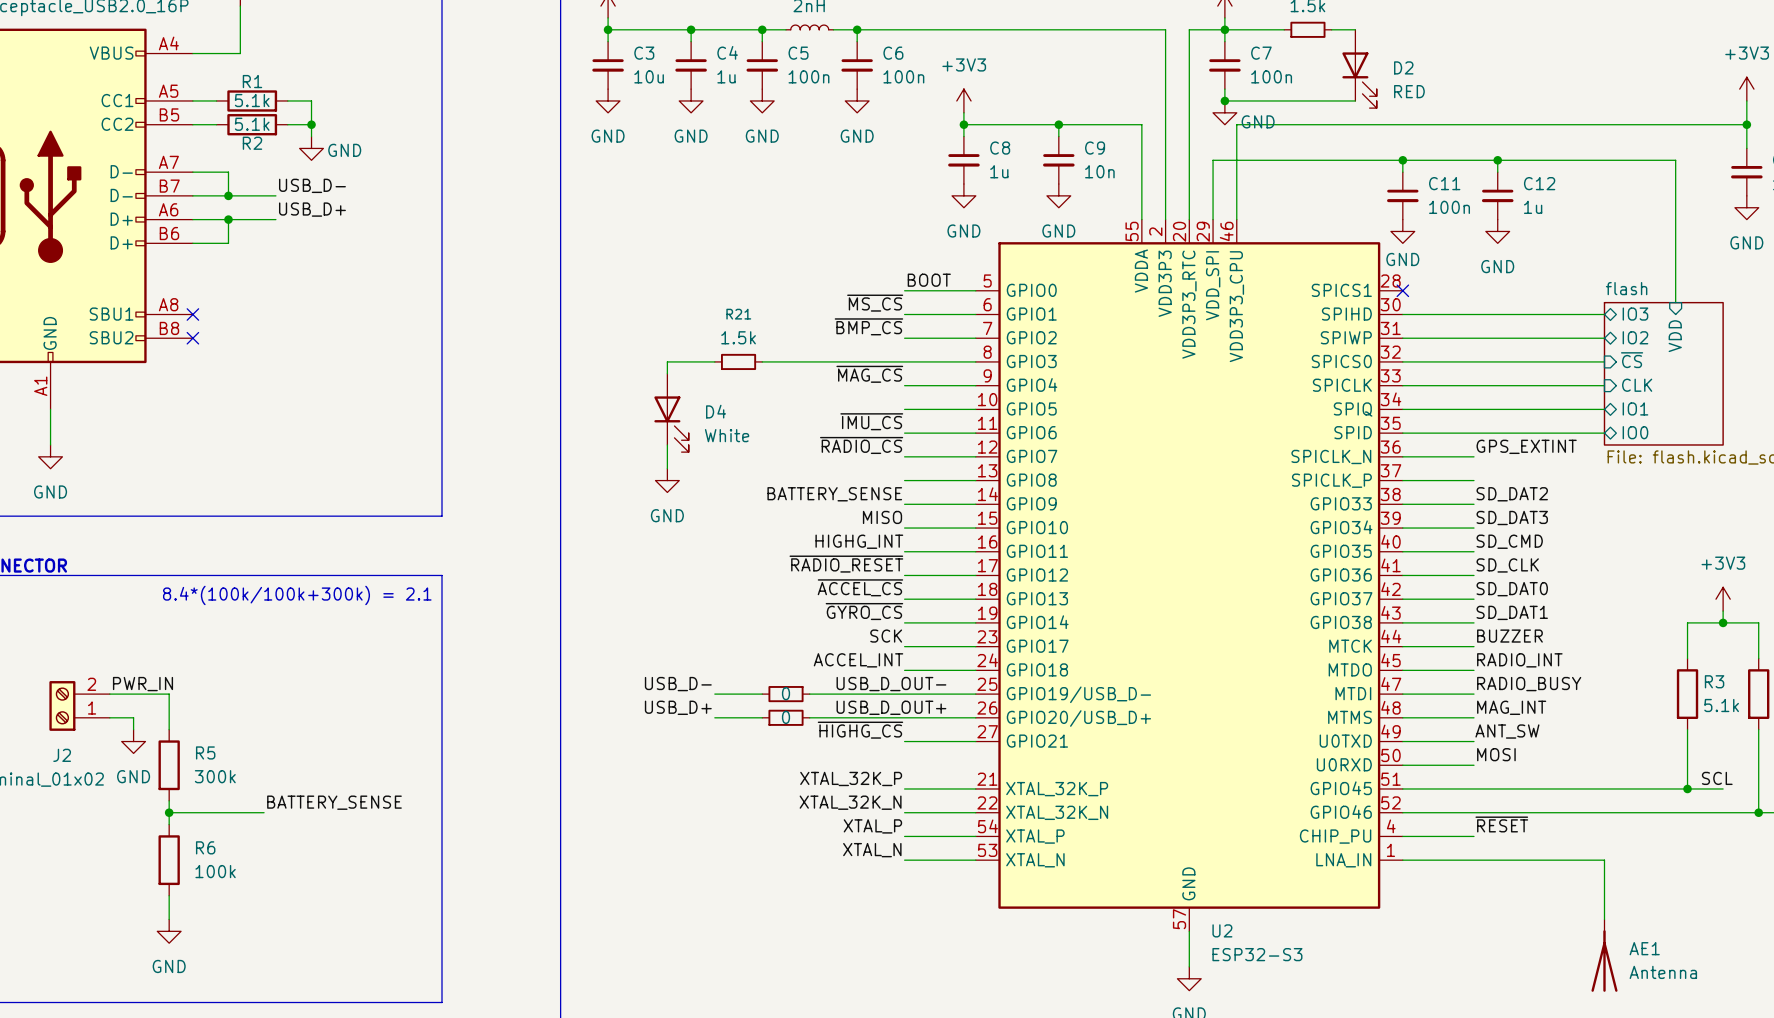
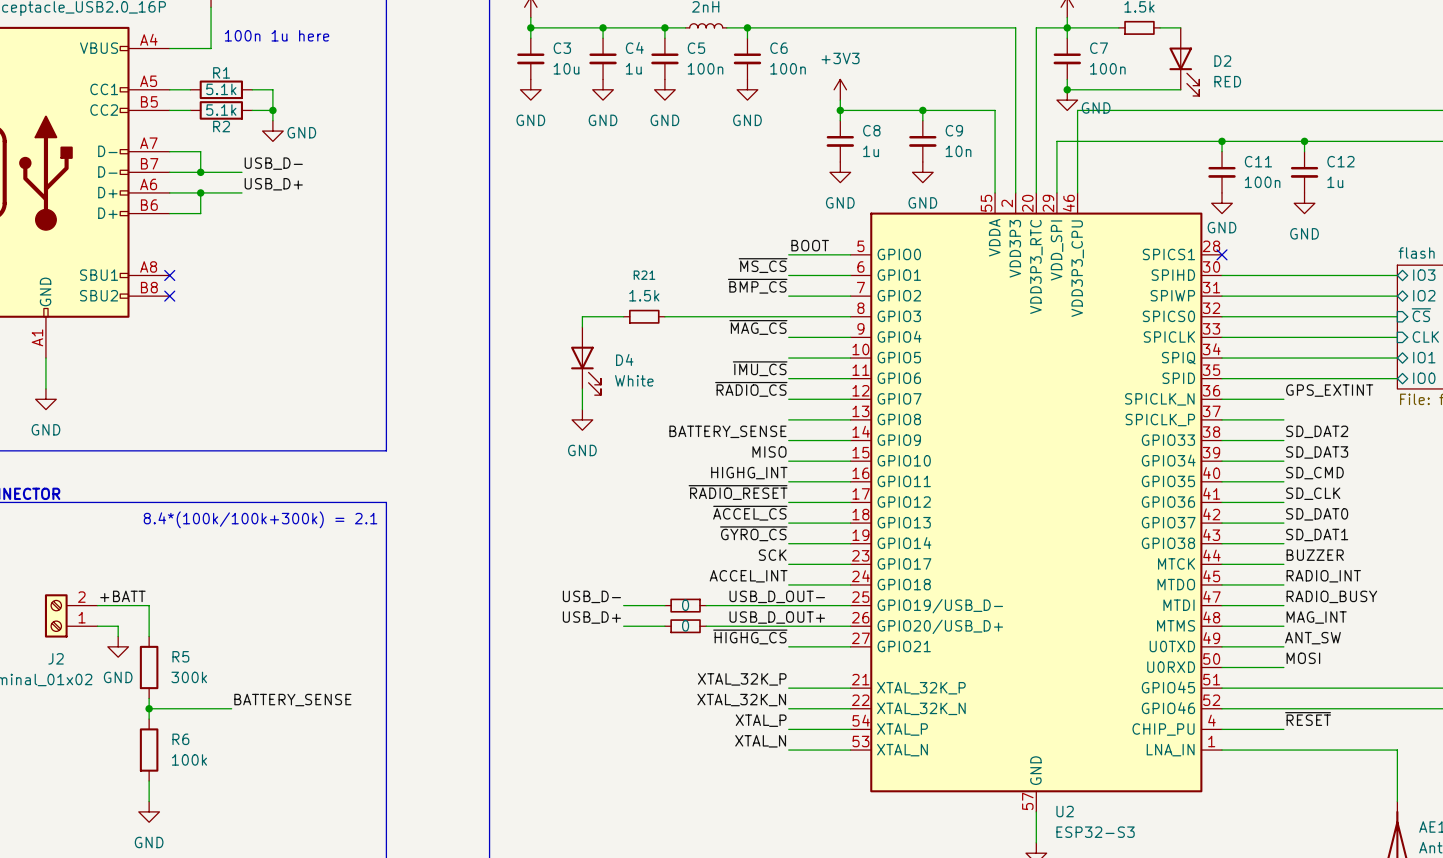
text: none -> 100n 1u here (277, 35)
label: PWR_IN (142, 684) -> +BATT (122, 596)

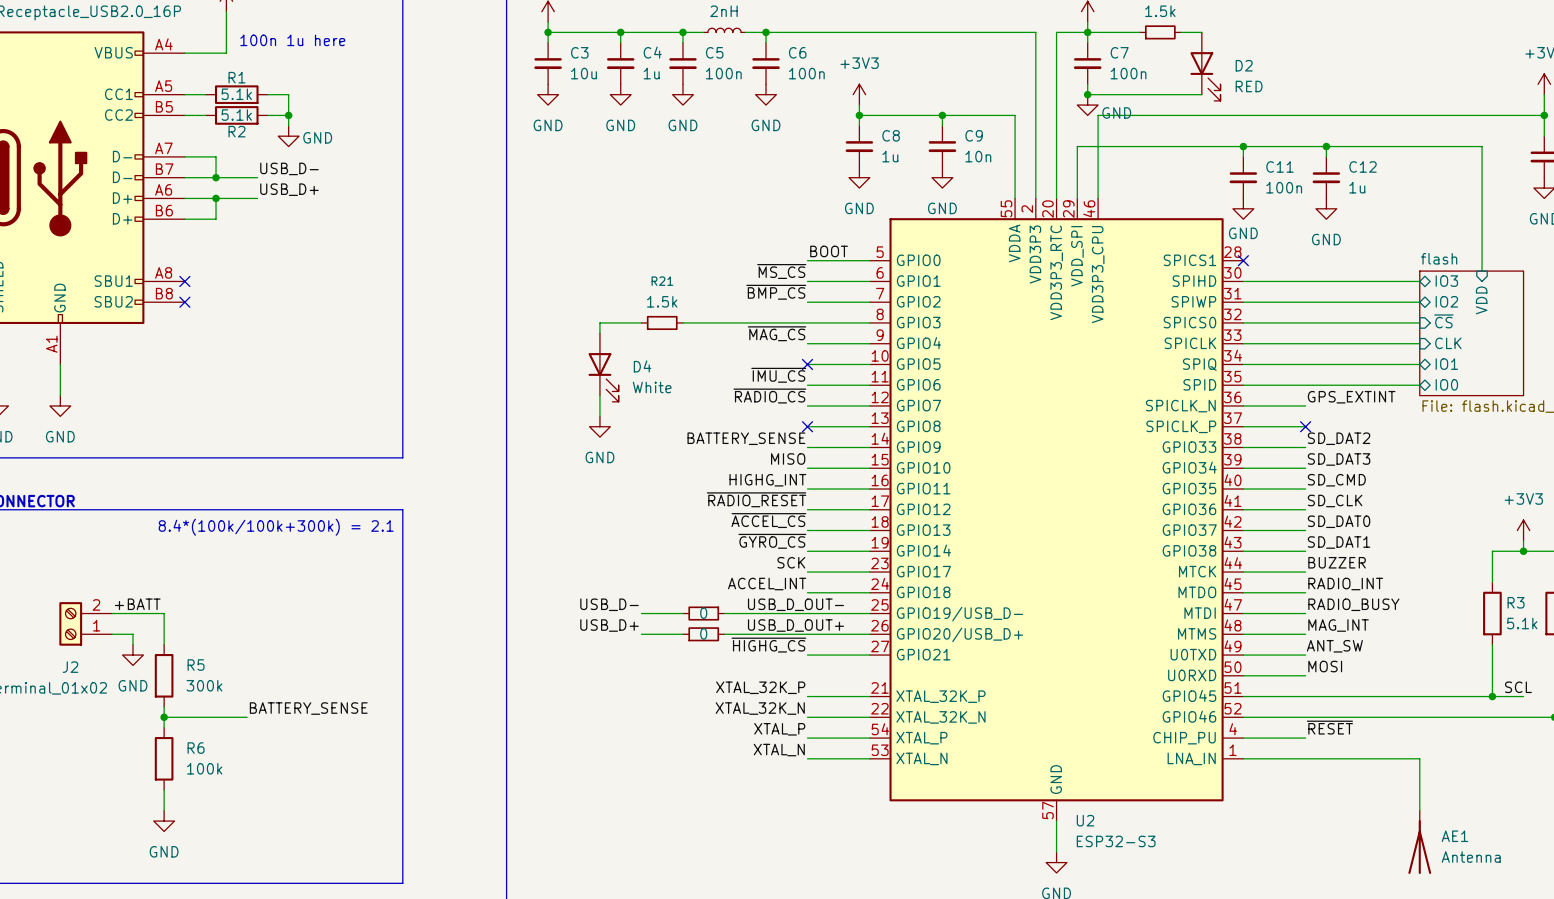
no-connect mark: none -> (807, 364)
no-connect mark: none -> (807, 426)
no-connect mark: none -> (1305, 426)

